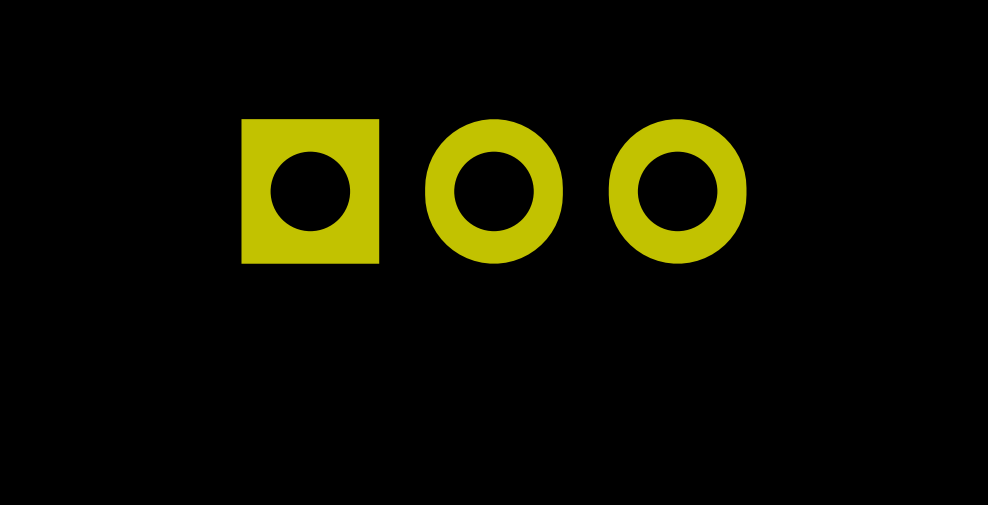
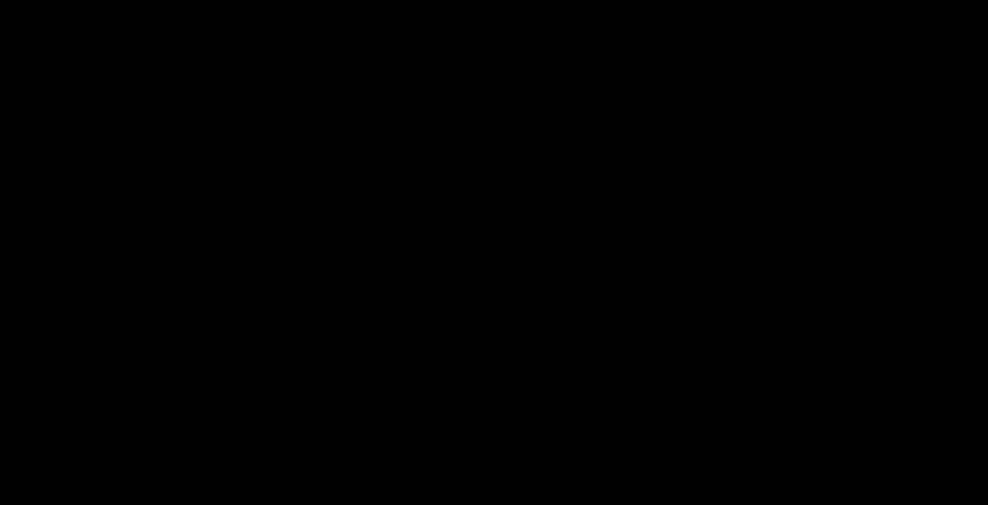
part: (493, 191) -> none

